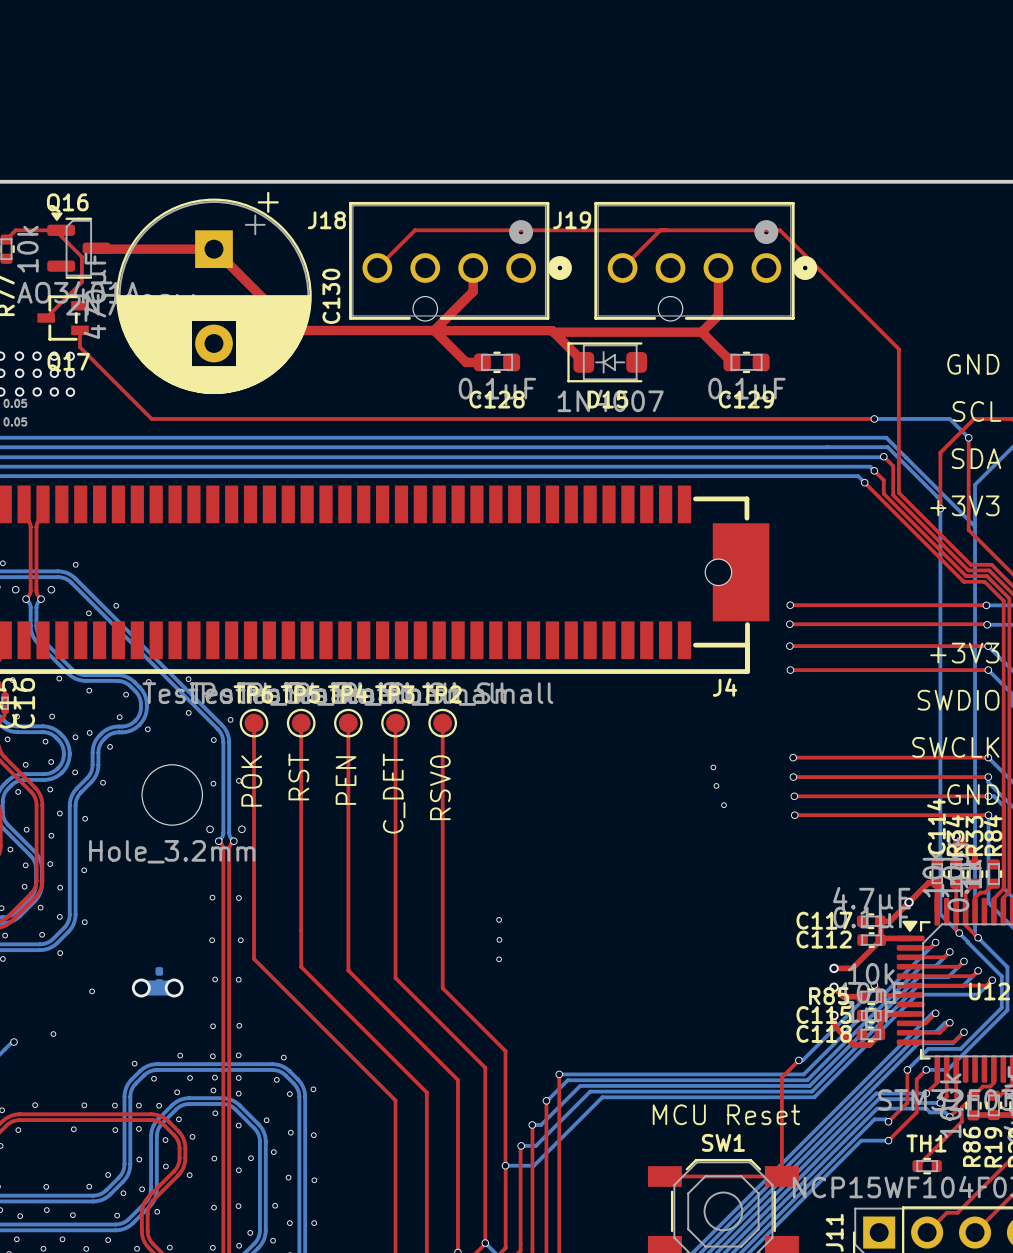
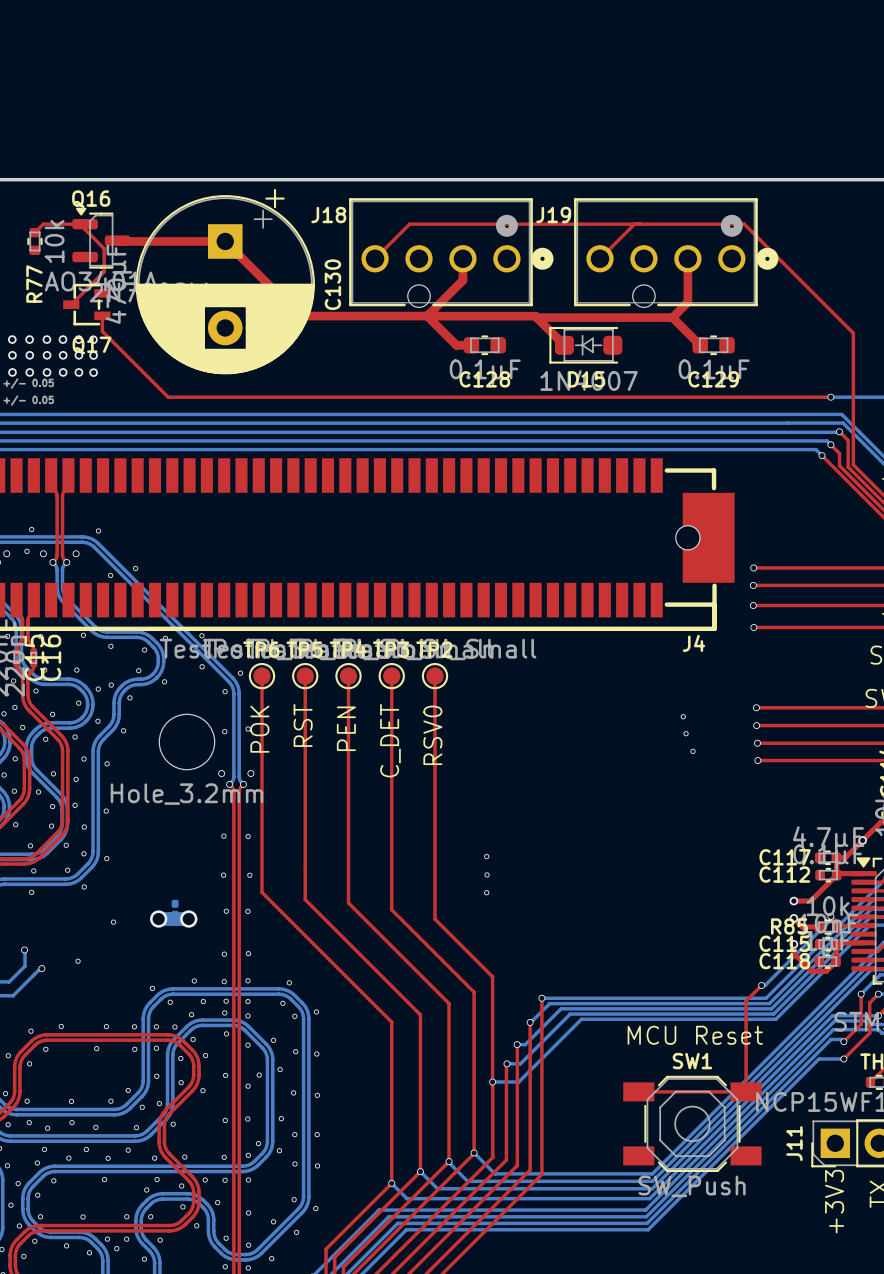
via: (45, 741) -> none
via: none -> (78, 703)
via: (51, 761) -> none

